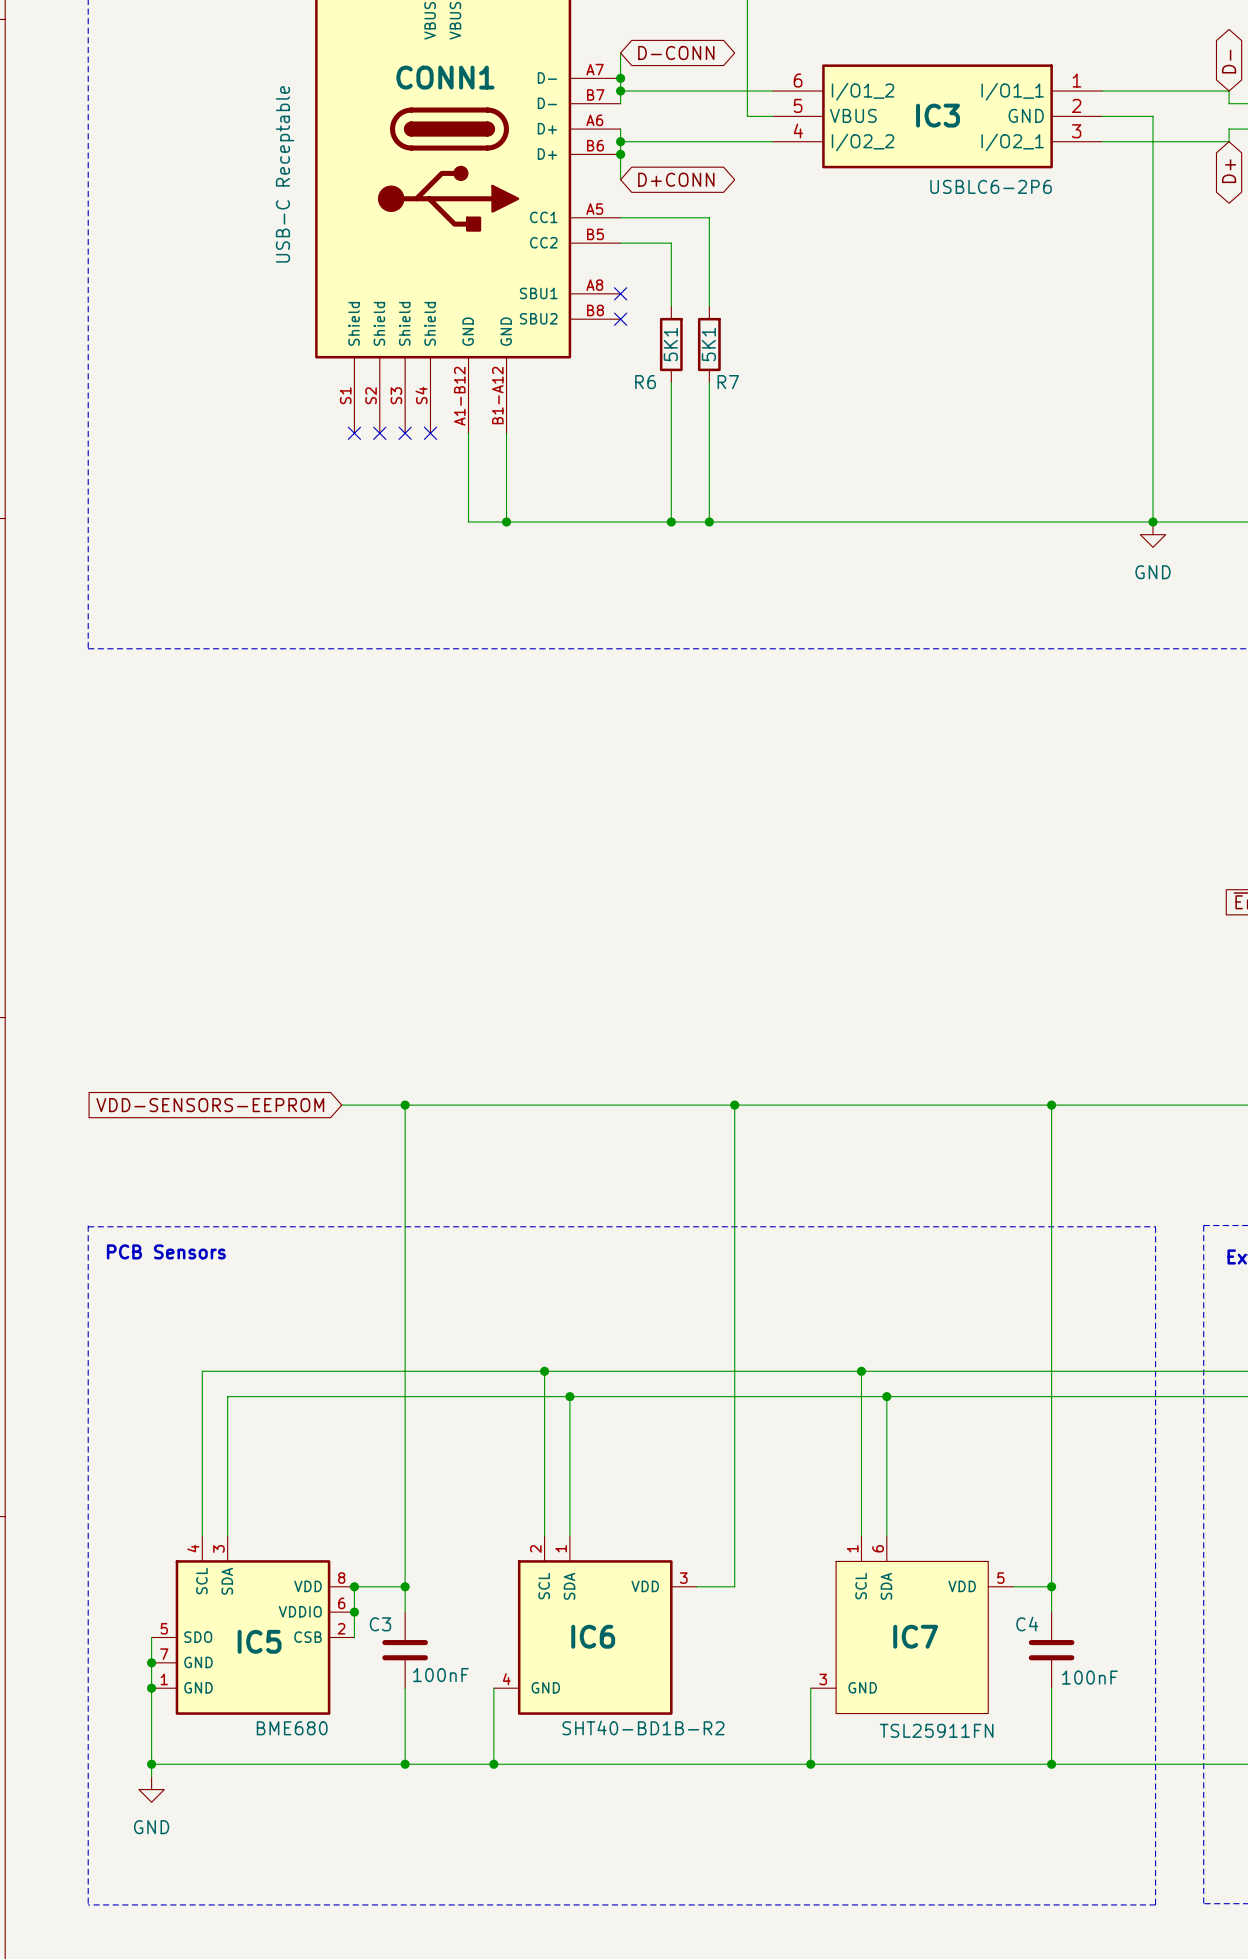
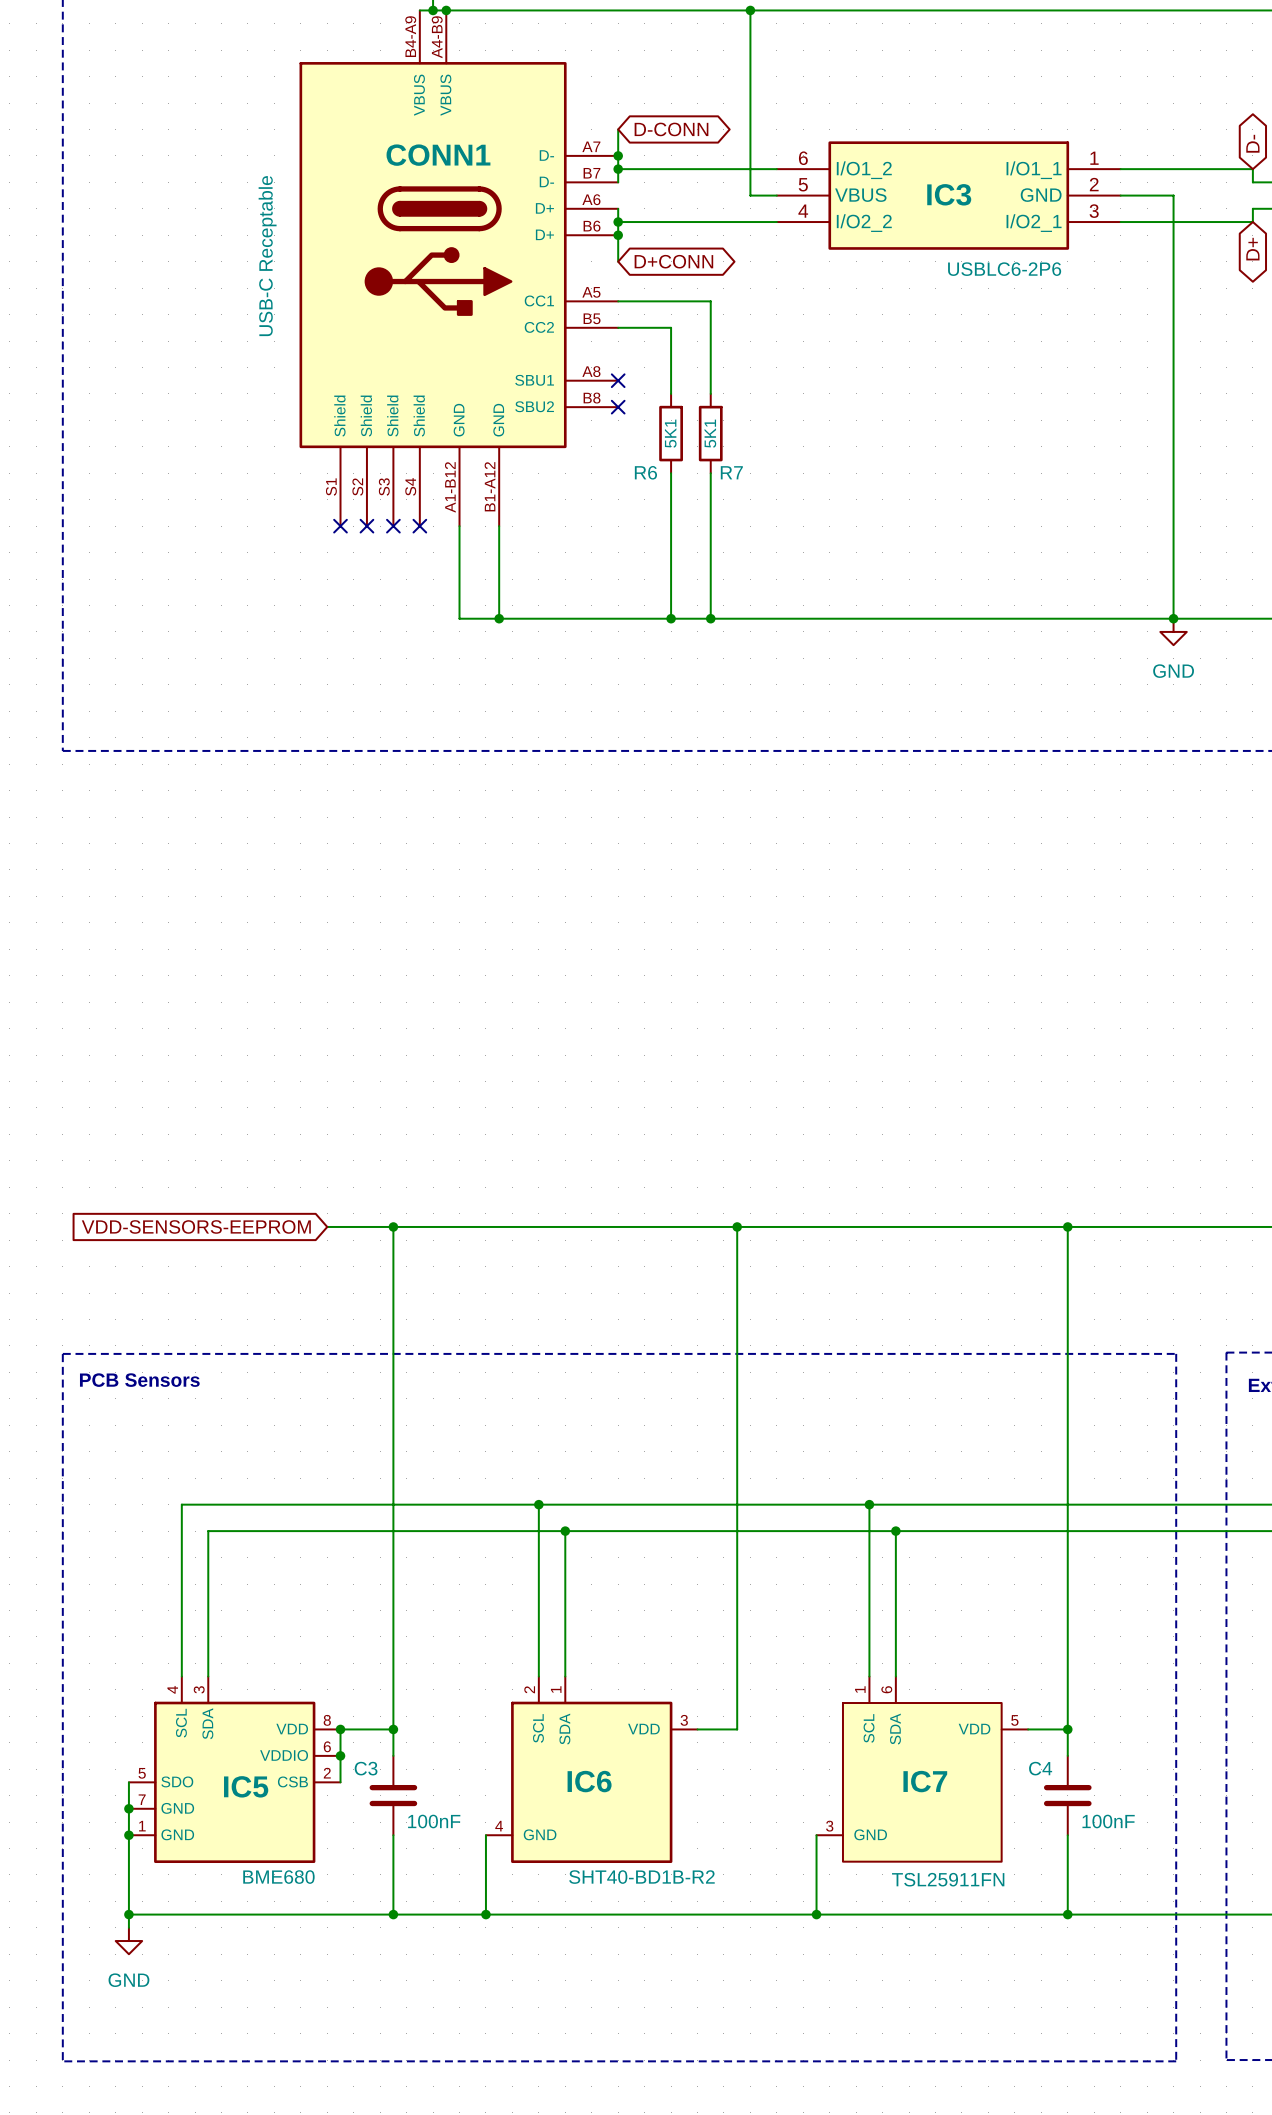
R6 text: 5K1 (670, 344) -> none
R6 value: none -> 5K1 (670, 433)
R7 text: 5K1 (708, 344) -> none
R7 value: none -> 5K1 (710, 433)
C3 text: 100nF (440, 1675) -> none
C3 value: none -> 100nF (434, 1821)
C4 value: none -> 100nF (1108, 1821)
C4 text: 100nF (1089, 1677) -> none

